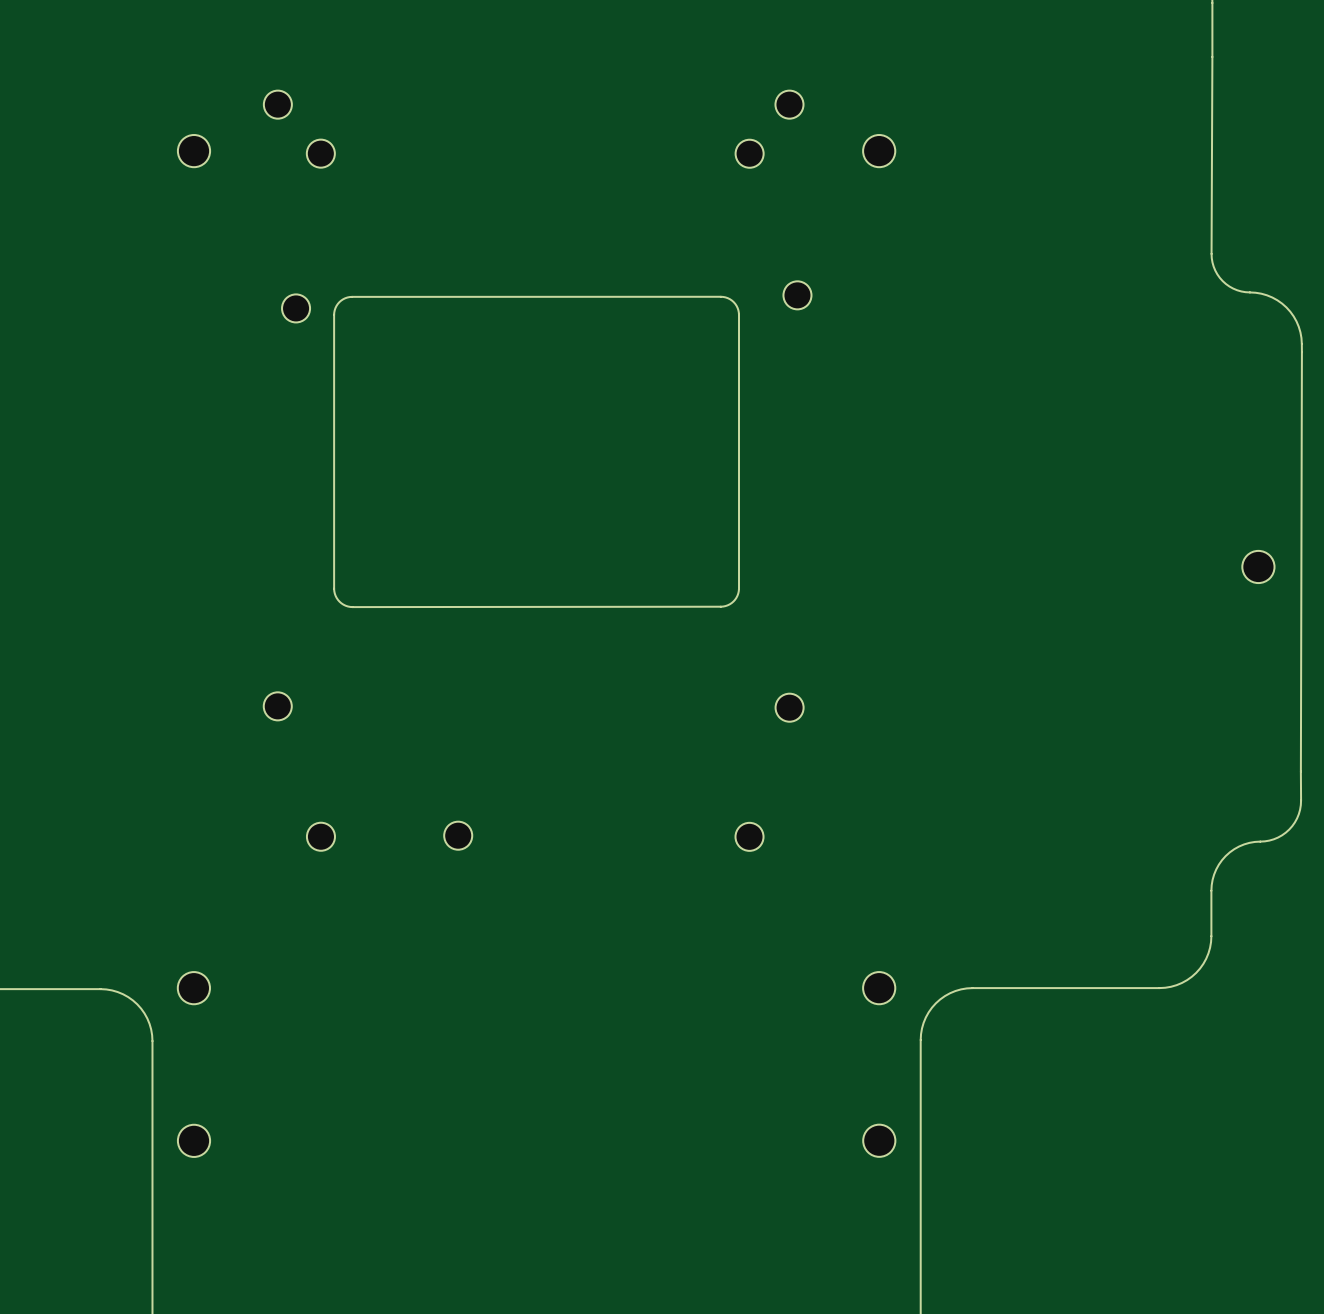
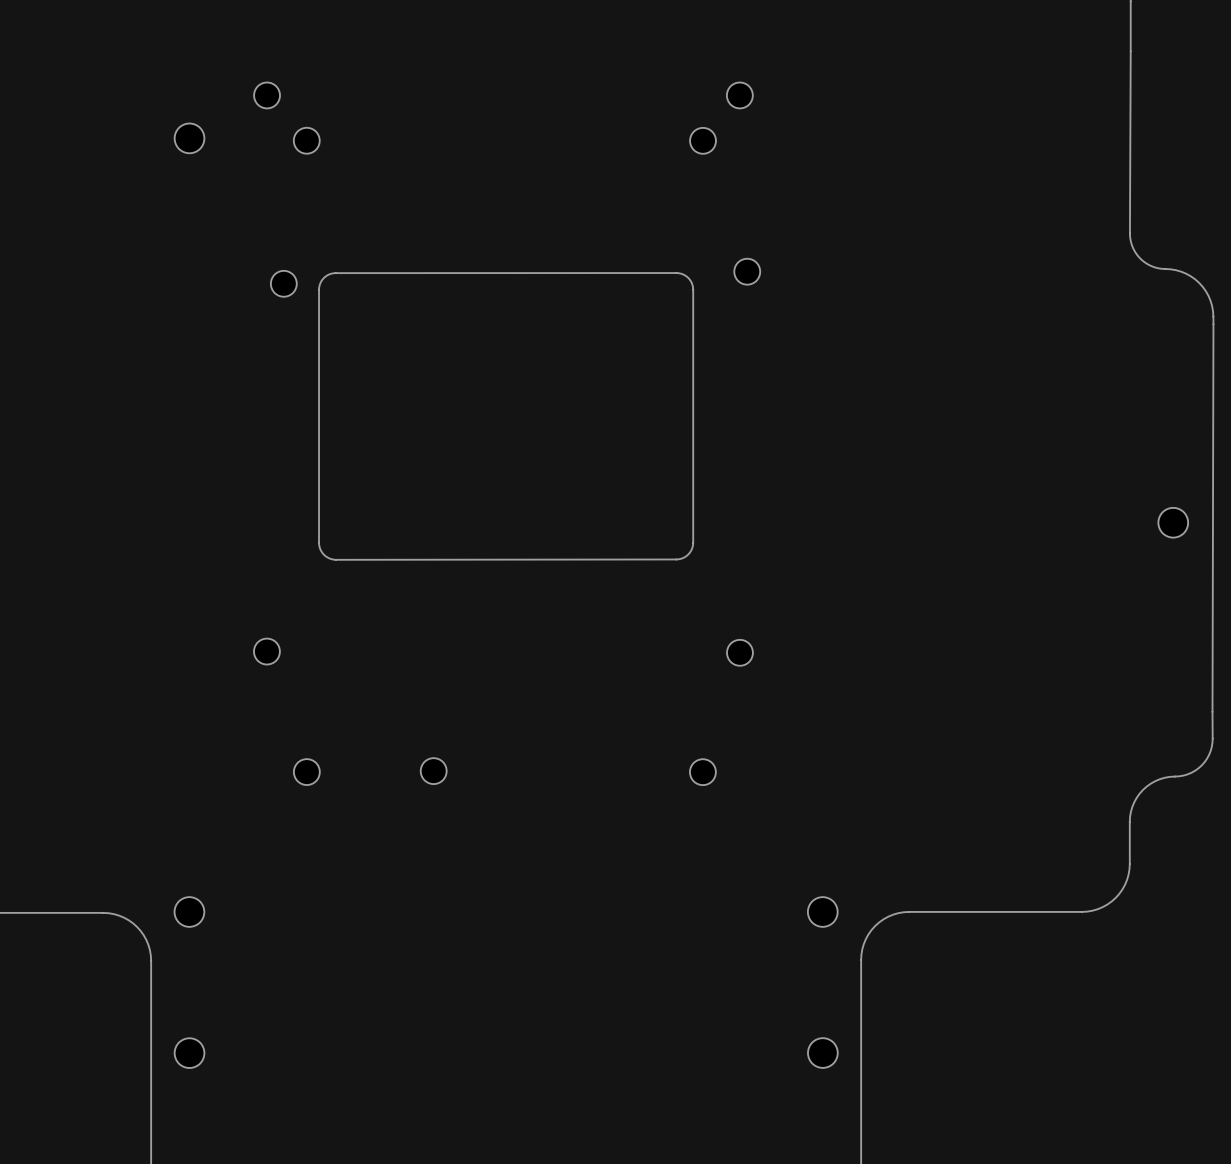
hole: (879, 151) -> none

